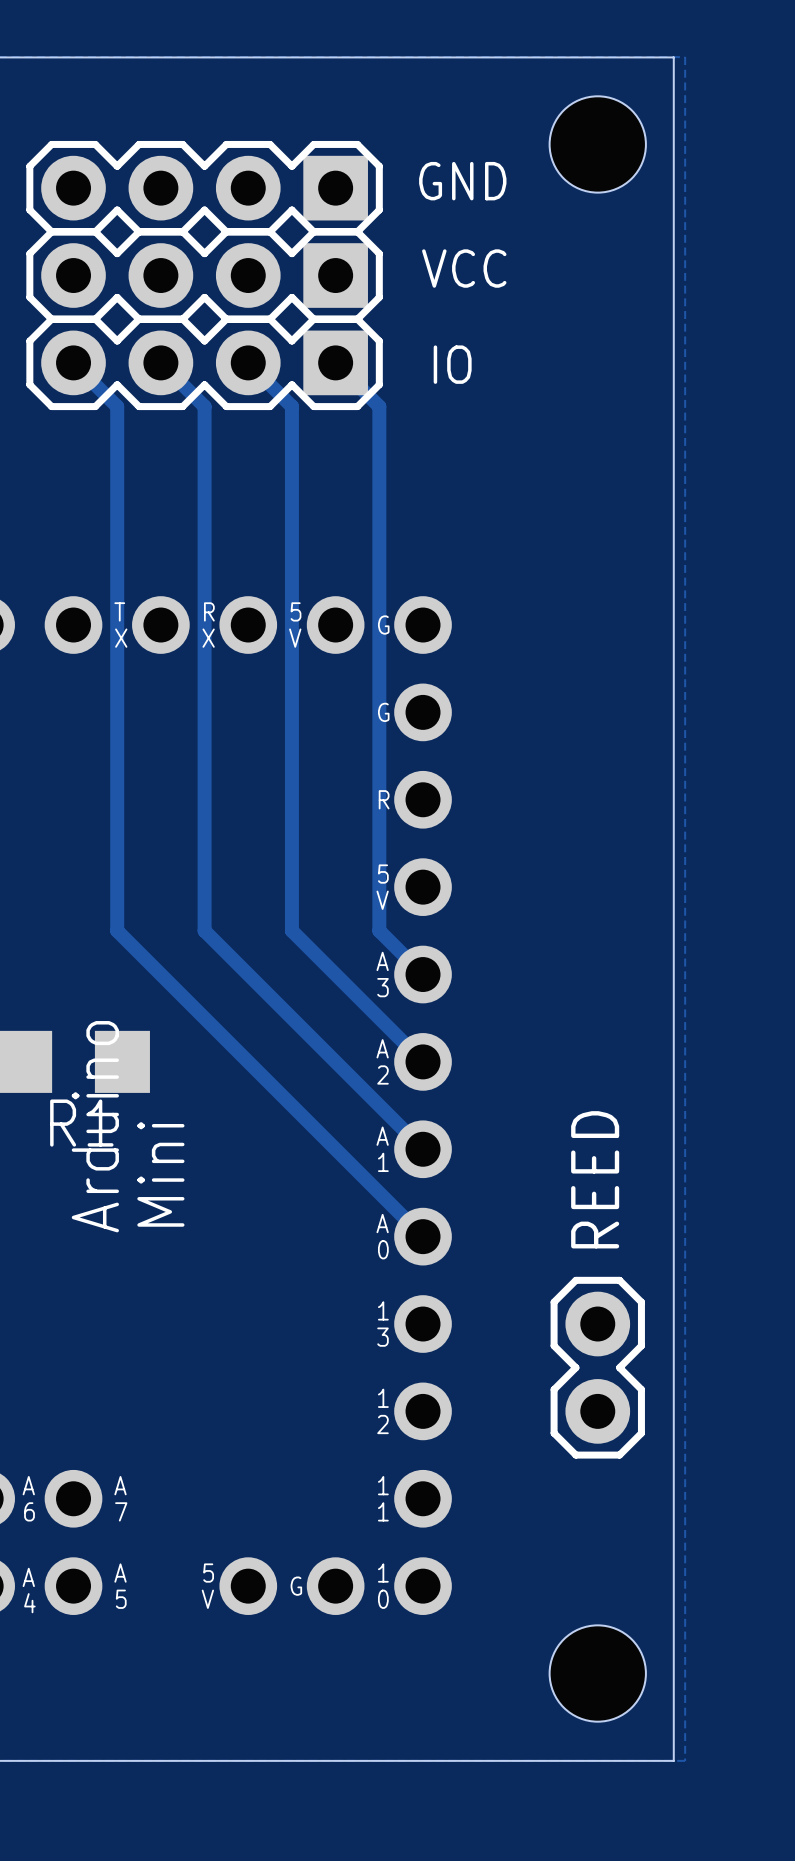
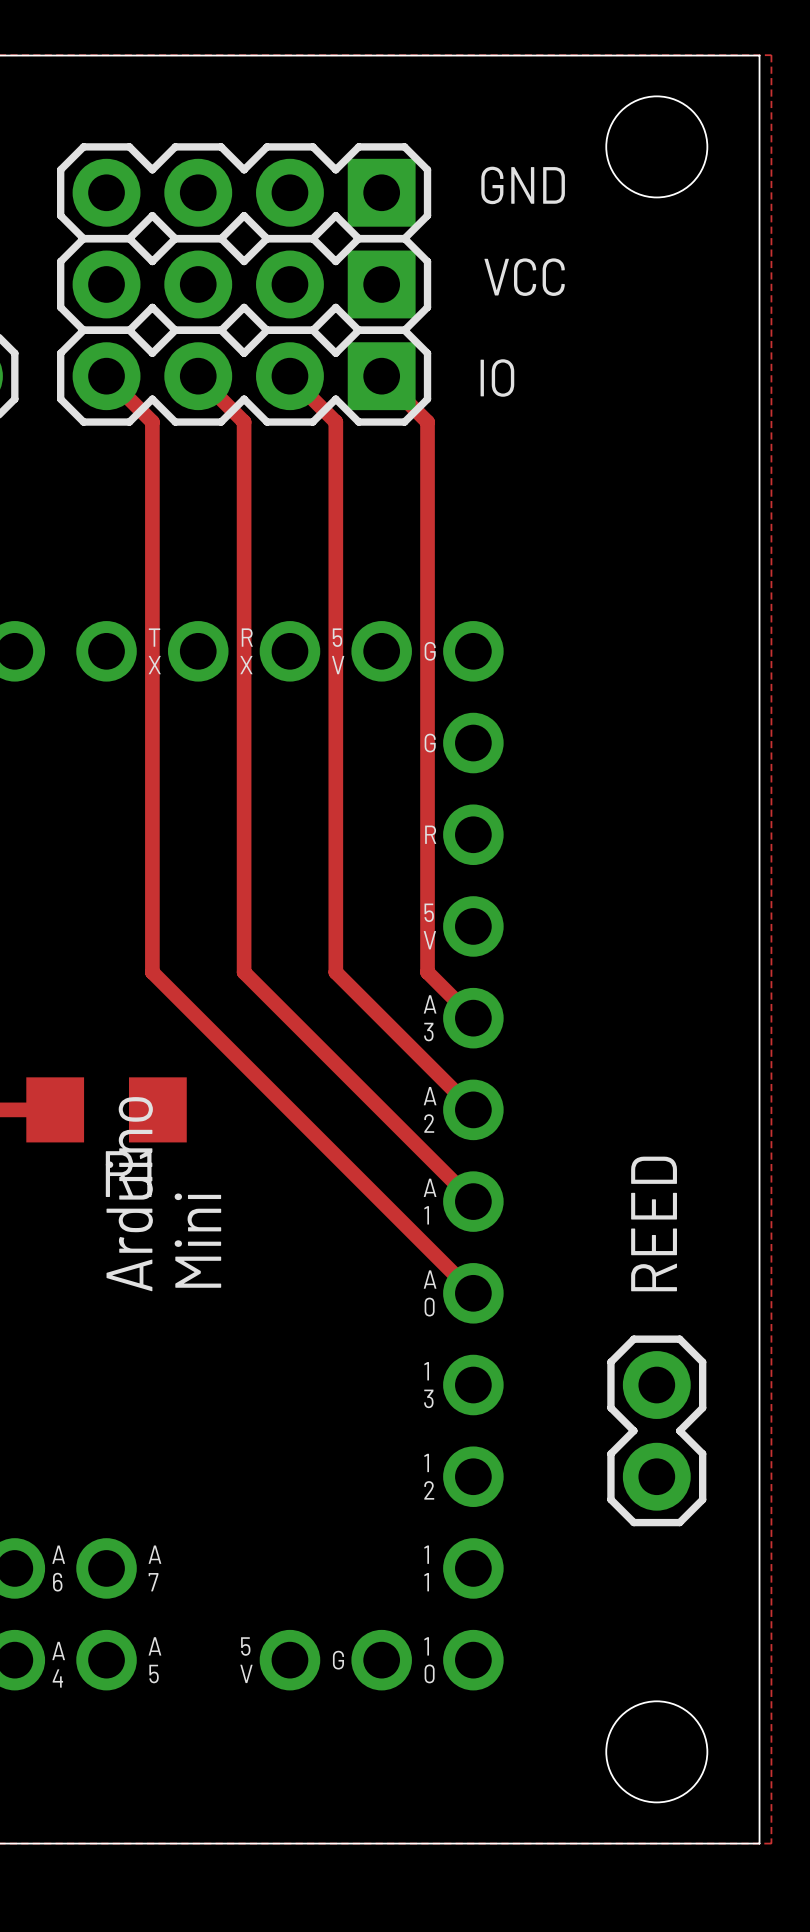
board edge: (673, 57) (673, 1760) -> (736, 55) (759, 55) (759, 1843) (736, 1843)
zone outline: (685, 57) (685, 1760) -> (748, 55) (771, 55) (771, 1843) (748, 1843)

